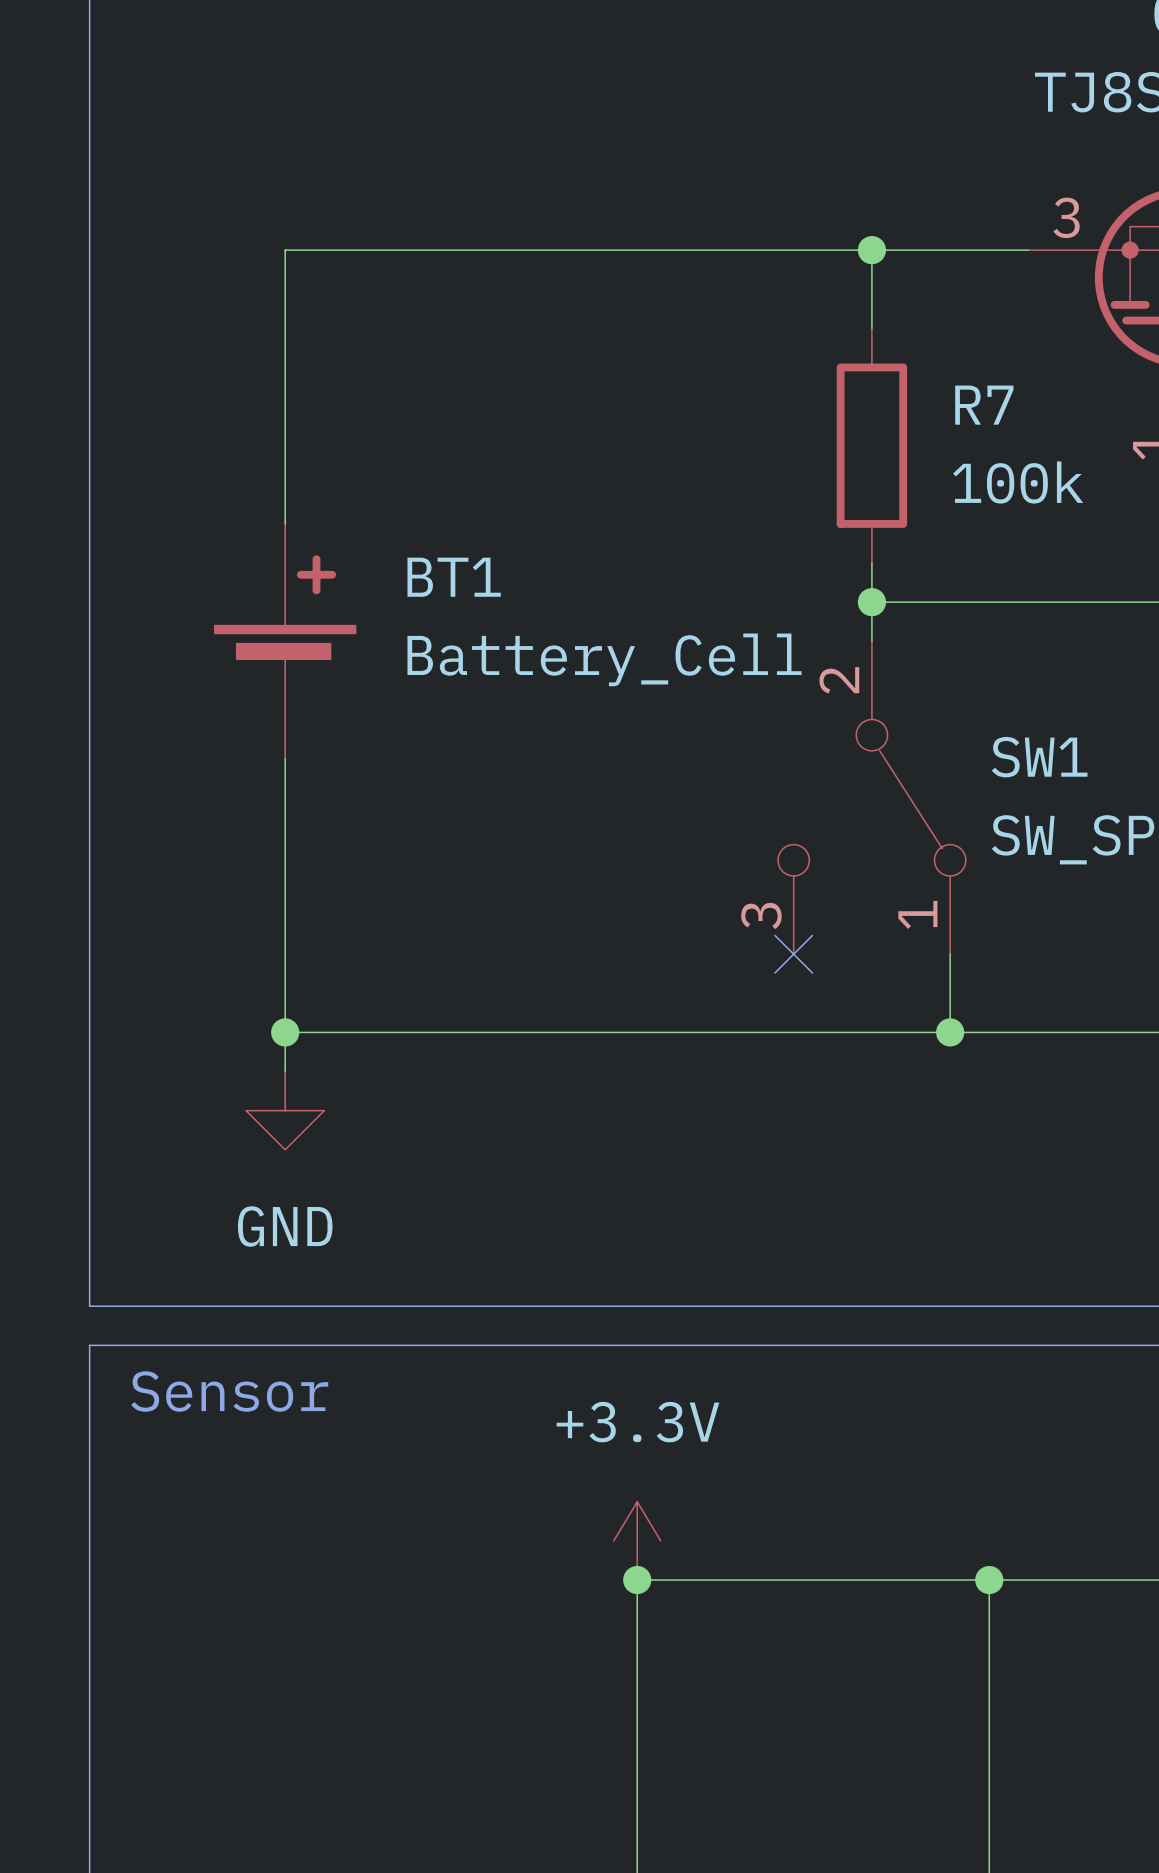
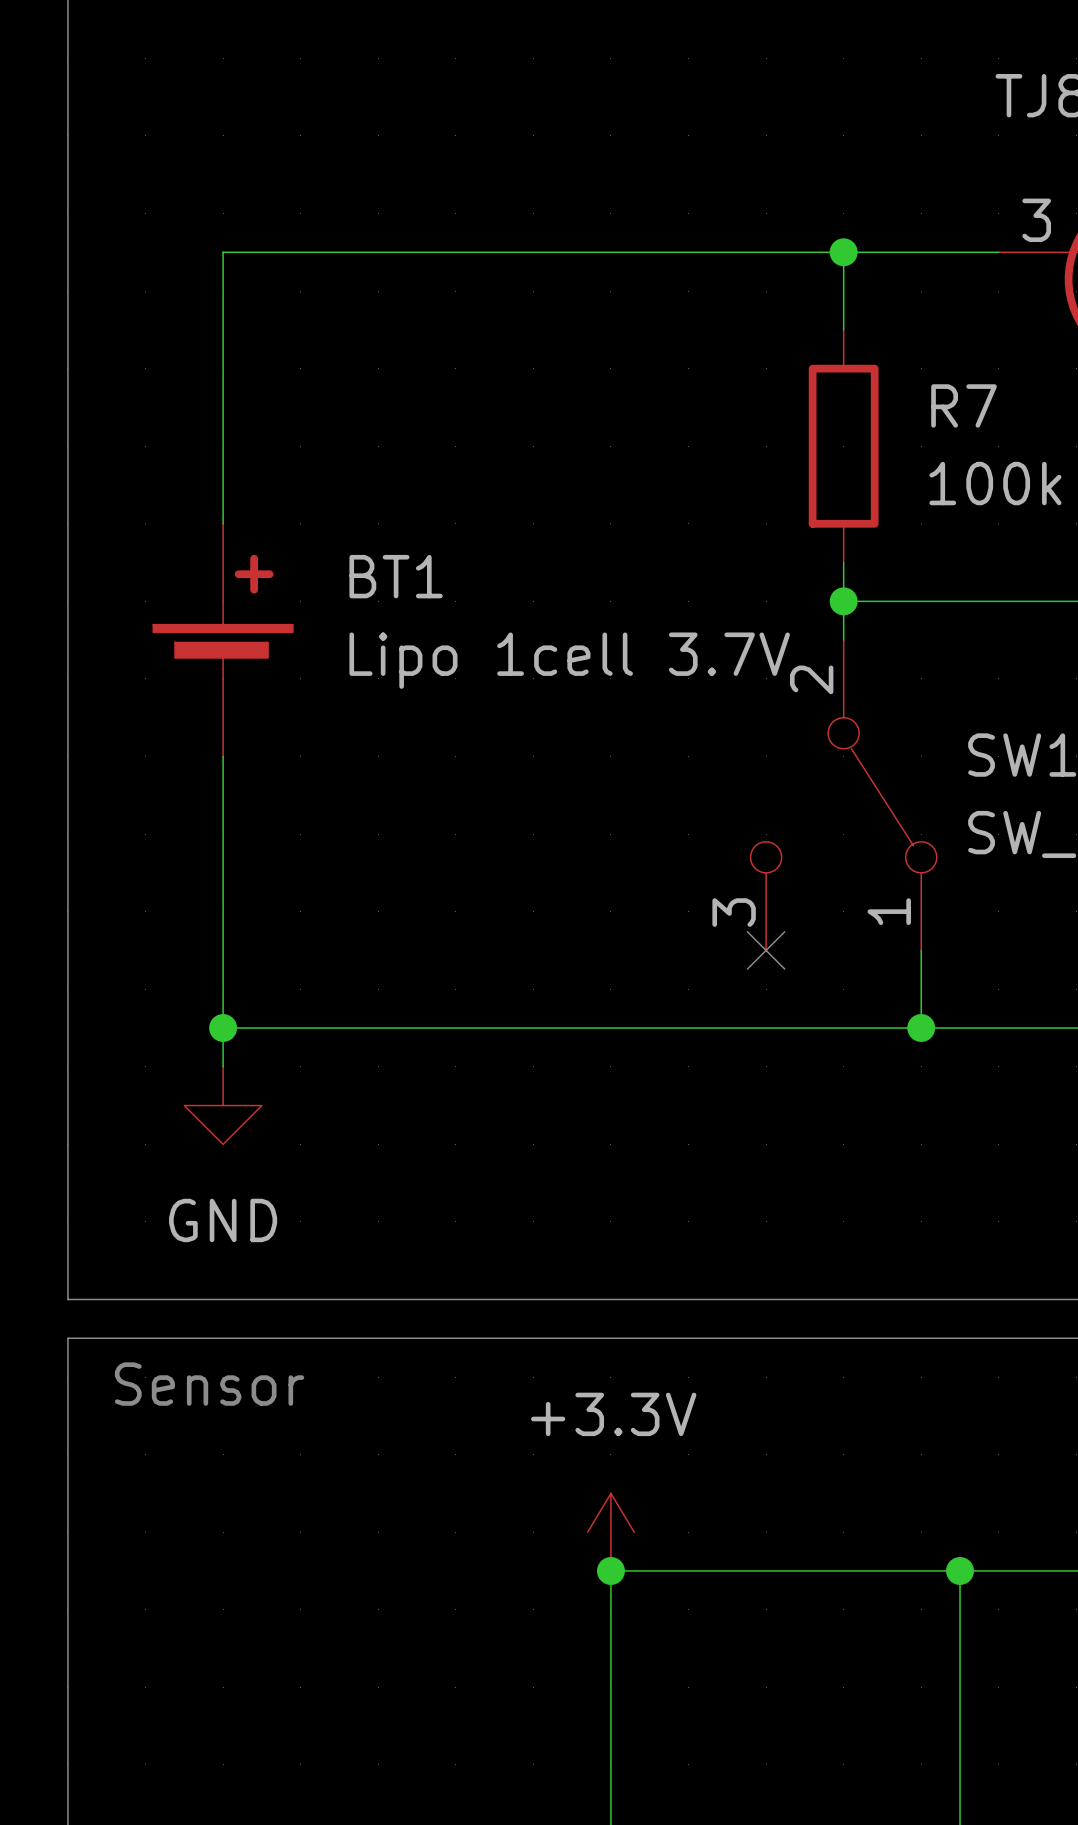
wire: (285, 250) (285, 523) -> (261, 252) (223, 252) (223, 523)
BT1 position: (285, 641) -> (223, 640)
BT1 value: Battery_Cell (604, 659) -> Lipo 1cell 3.7V (569, 660)
wire: (285, 758) (285, 1071) -> (223, 756) (223, 1066)
wire: none -> (223, 1027) (261, 1027)
junction position: (285, 1032) -> (223, 1027)
power symbol position: GND (285, 1110) -> GND (223, 1105)

